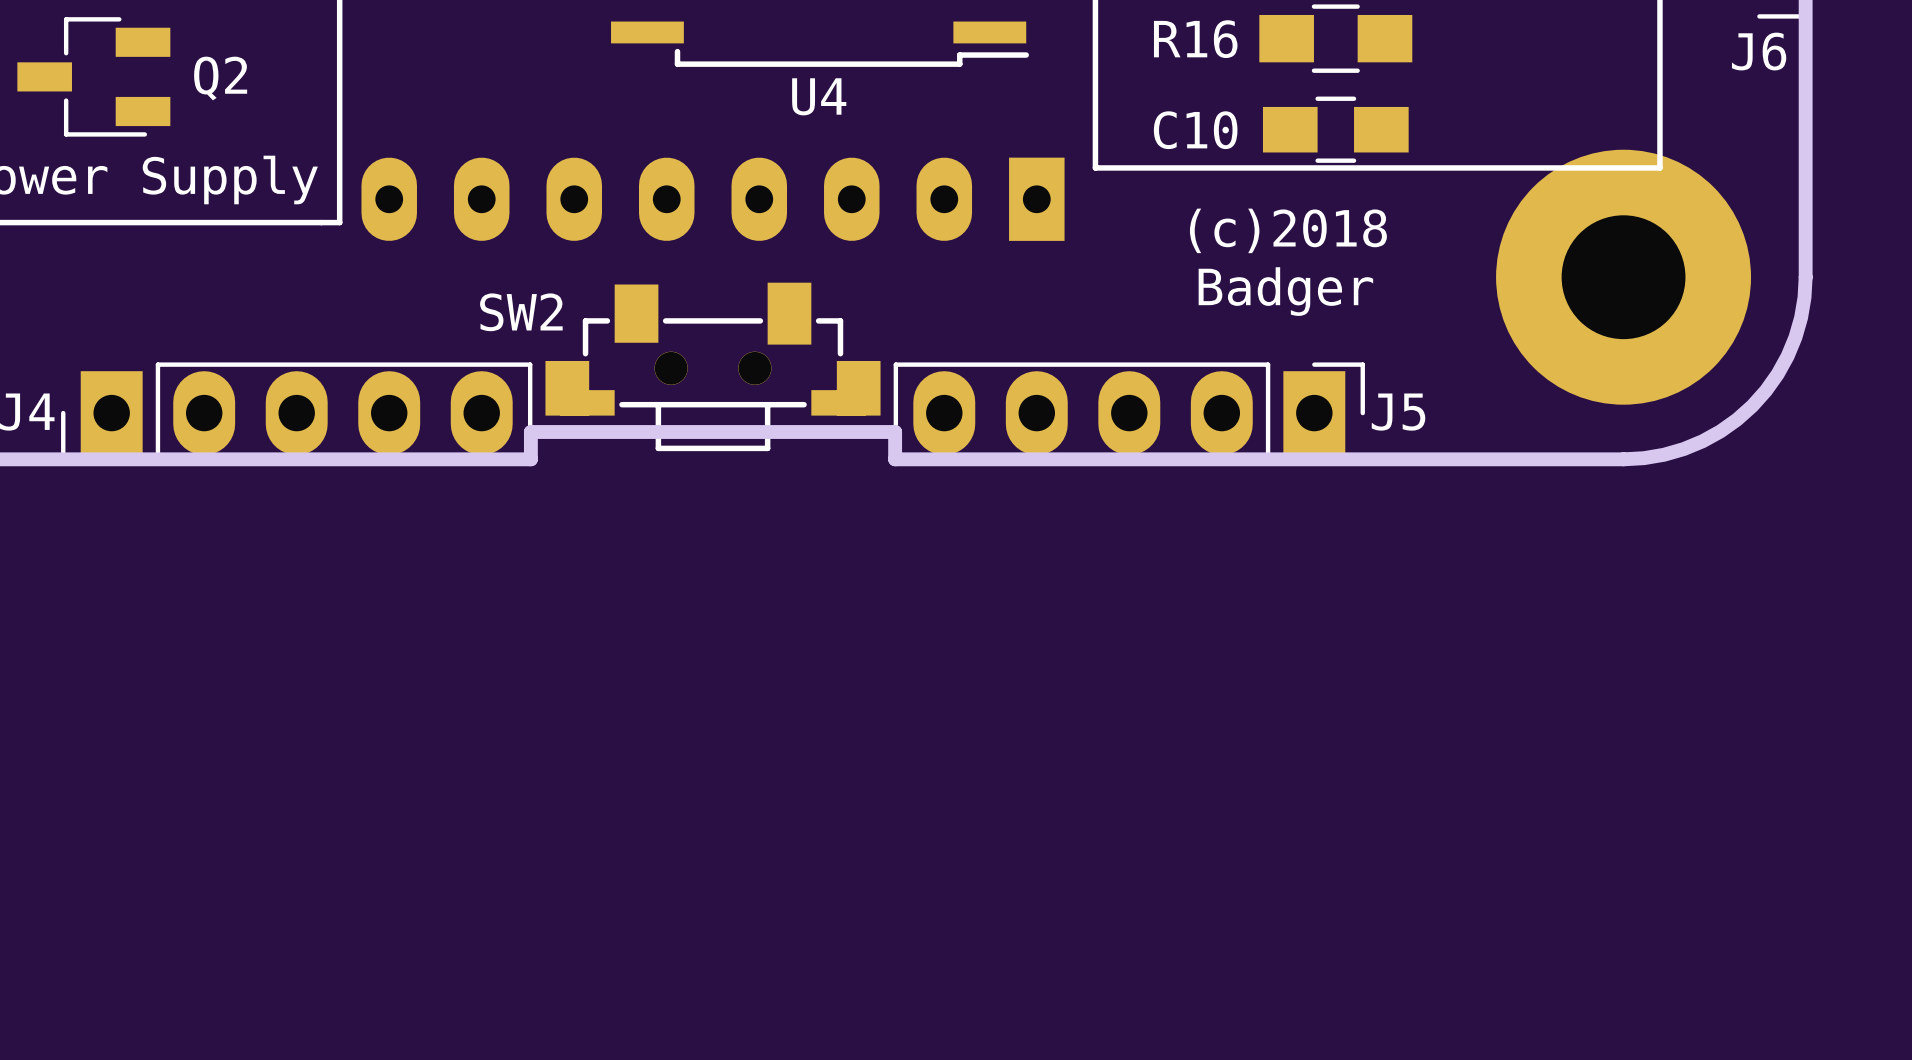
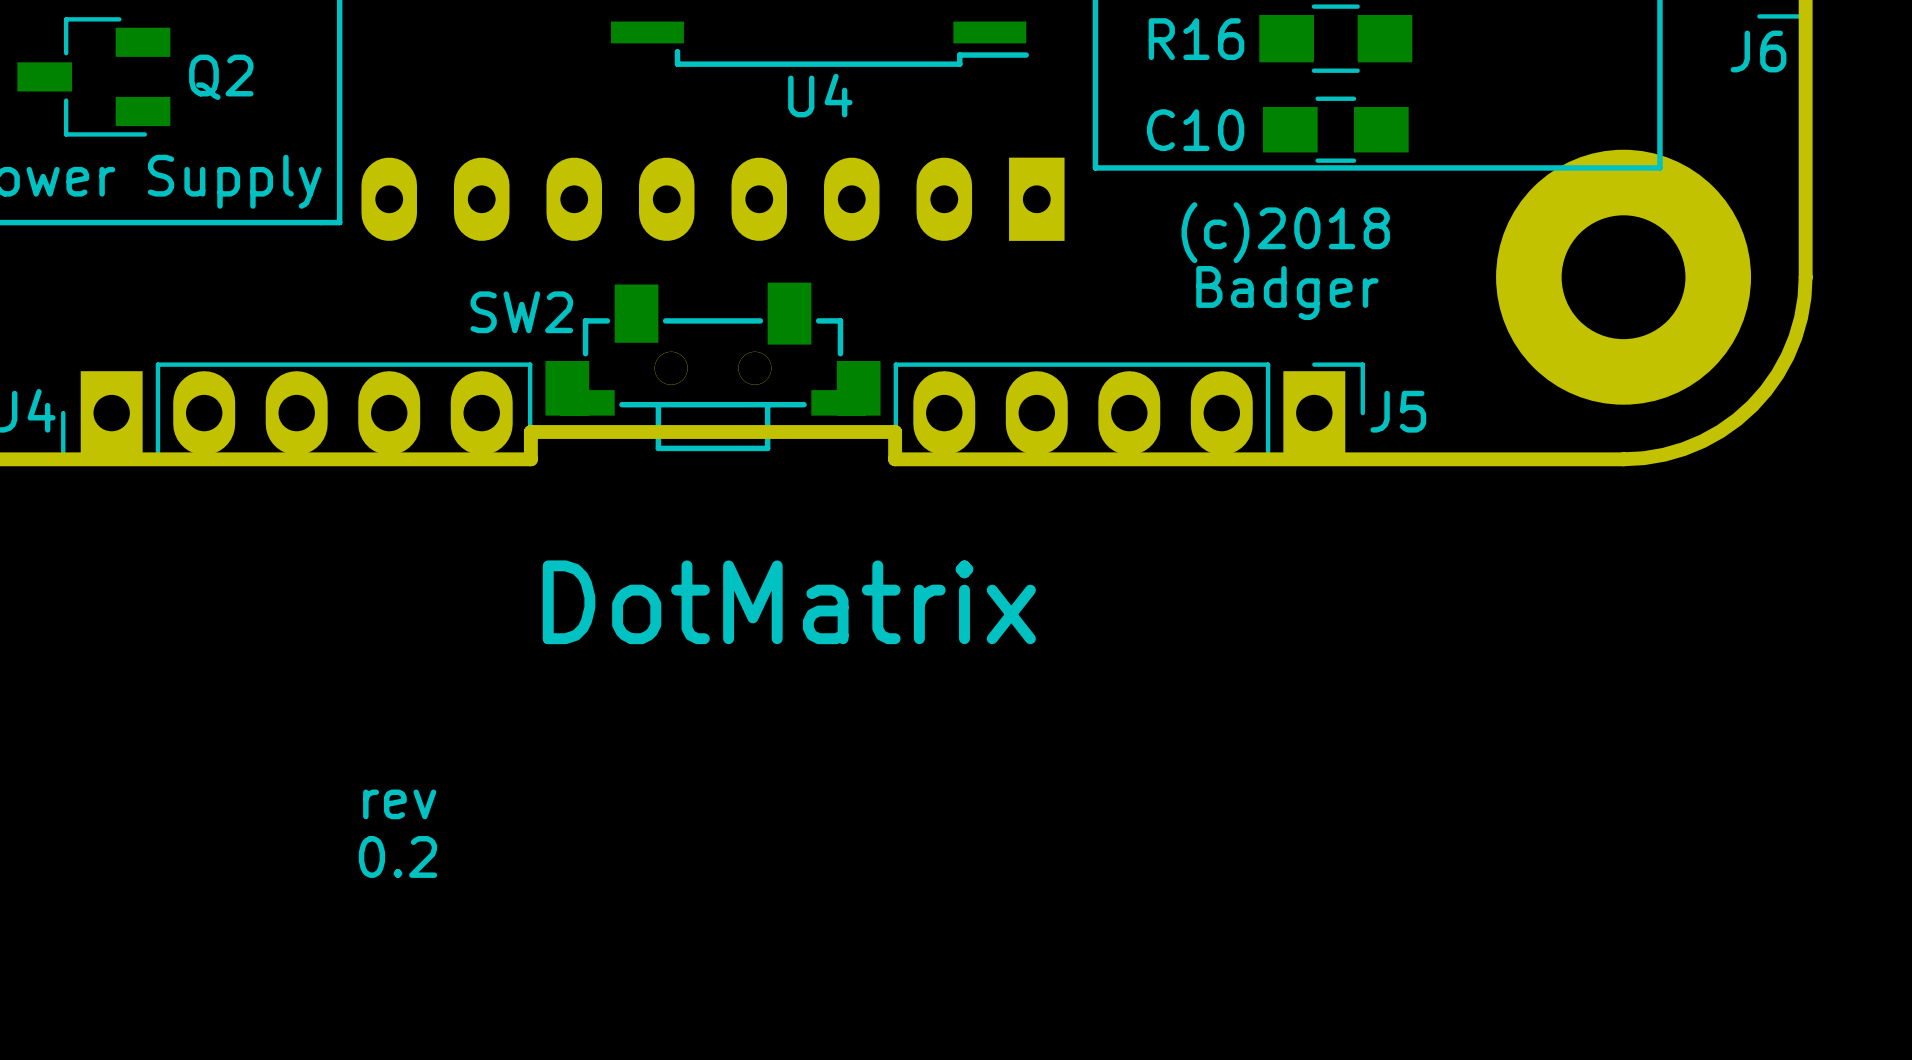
text: none -> DotMatrix (789, 602)
text: none -> rev (399, 804)
text: none -> 0.2 (397, 856)

